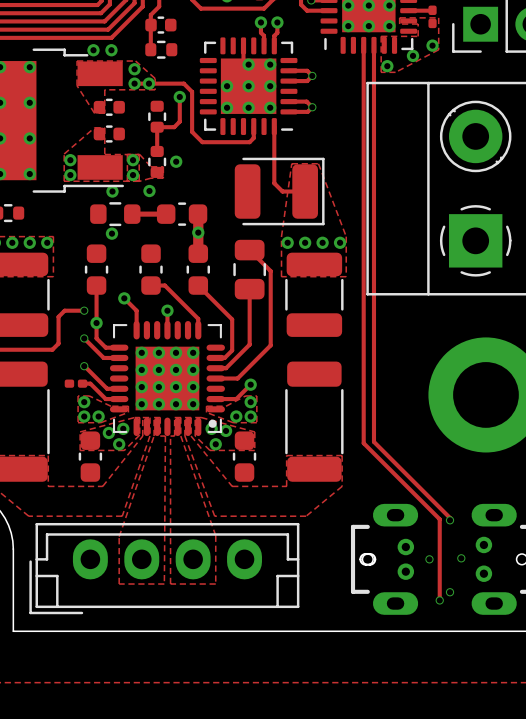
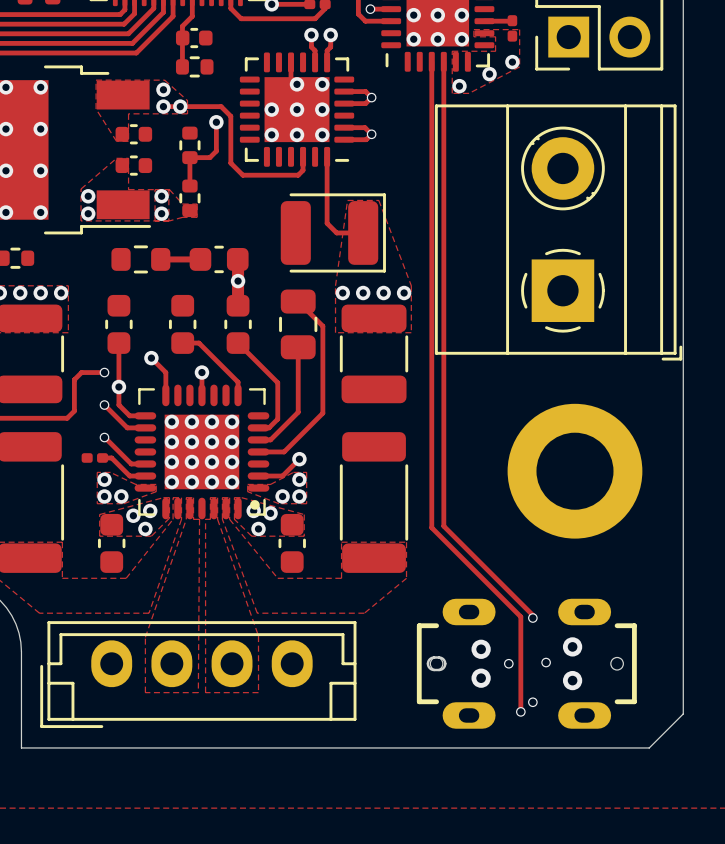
via: (93, 50) -> none
via: (111, 50) -> none
via: (176, 161) -> none
via: (112, 191) -> none
via: (149, 191) -> none
via: (111, 233) -> none

